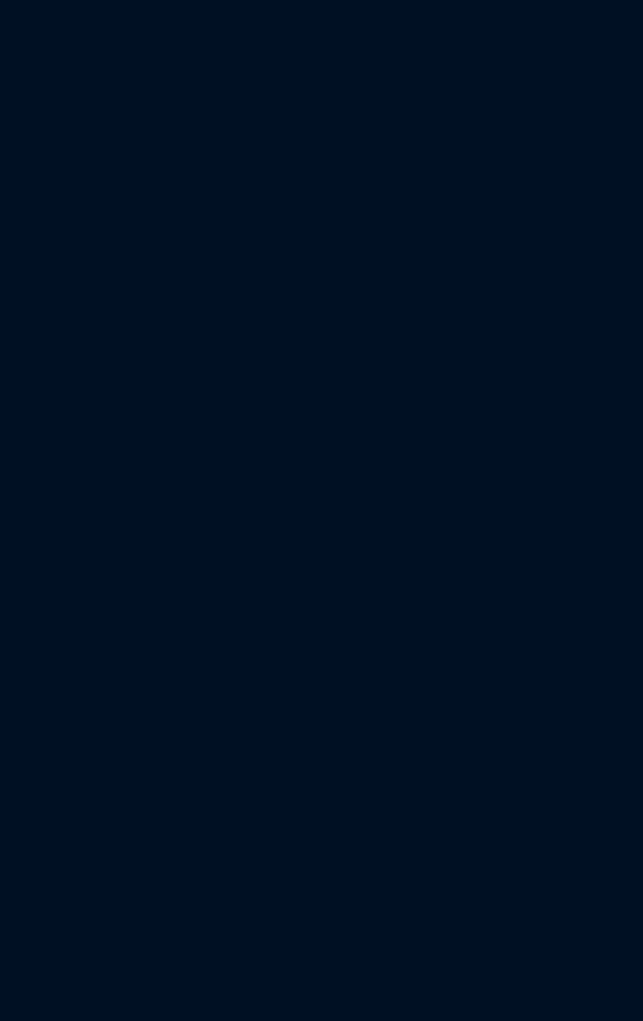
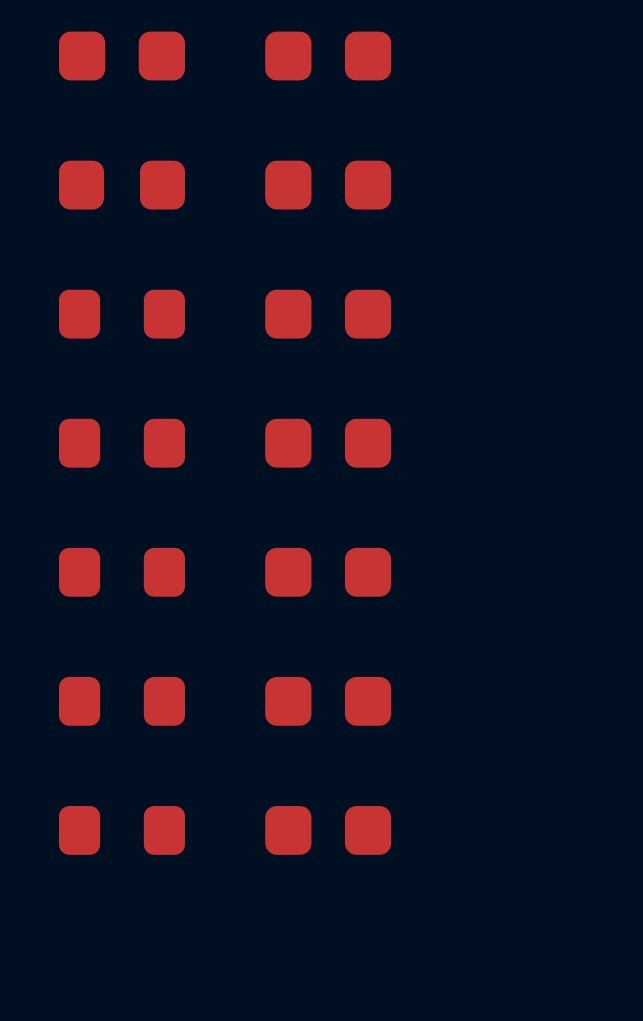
part: none -> (121, 56)
part: none -> (328, 56)
part: none -> (121, 185)
part: none -> (328, 185)
part: none -> (121, 314)
part: none -> (328, 314)
part: none -> (121, 443)
part: none -> (328, 443)
part: none -> (121, 572)
part: none -> (328, 572)
part: none -> (121, 701)
part: none -> (328, 701)
part: none -> (121, 830)
part: none -> (328, 830)

